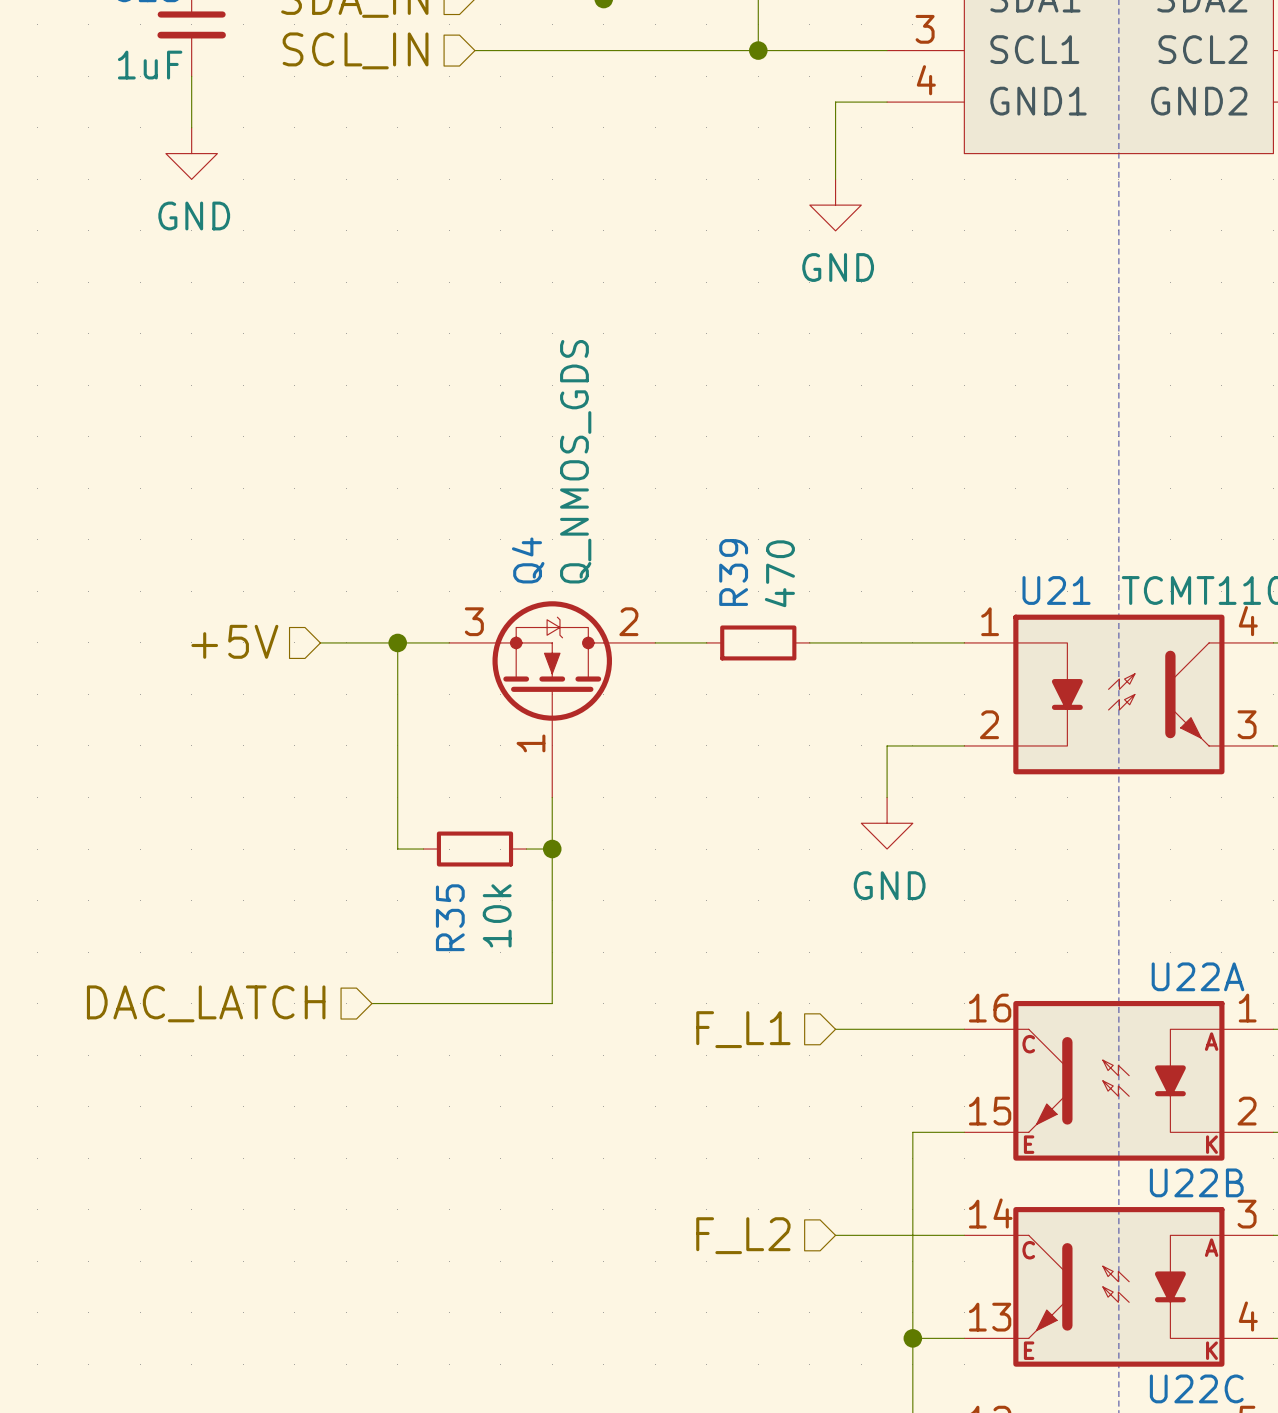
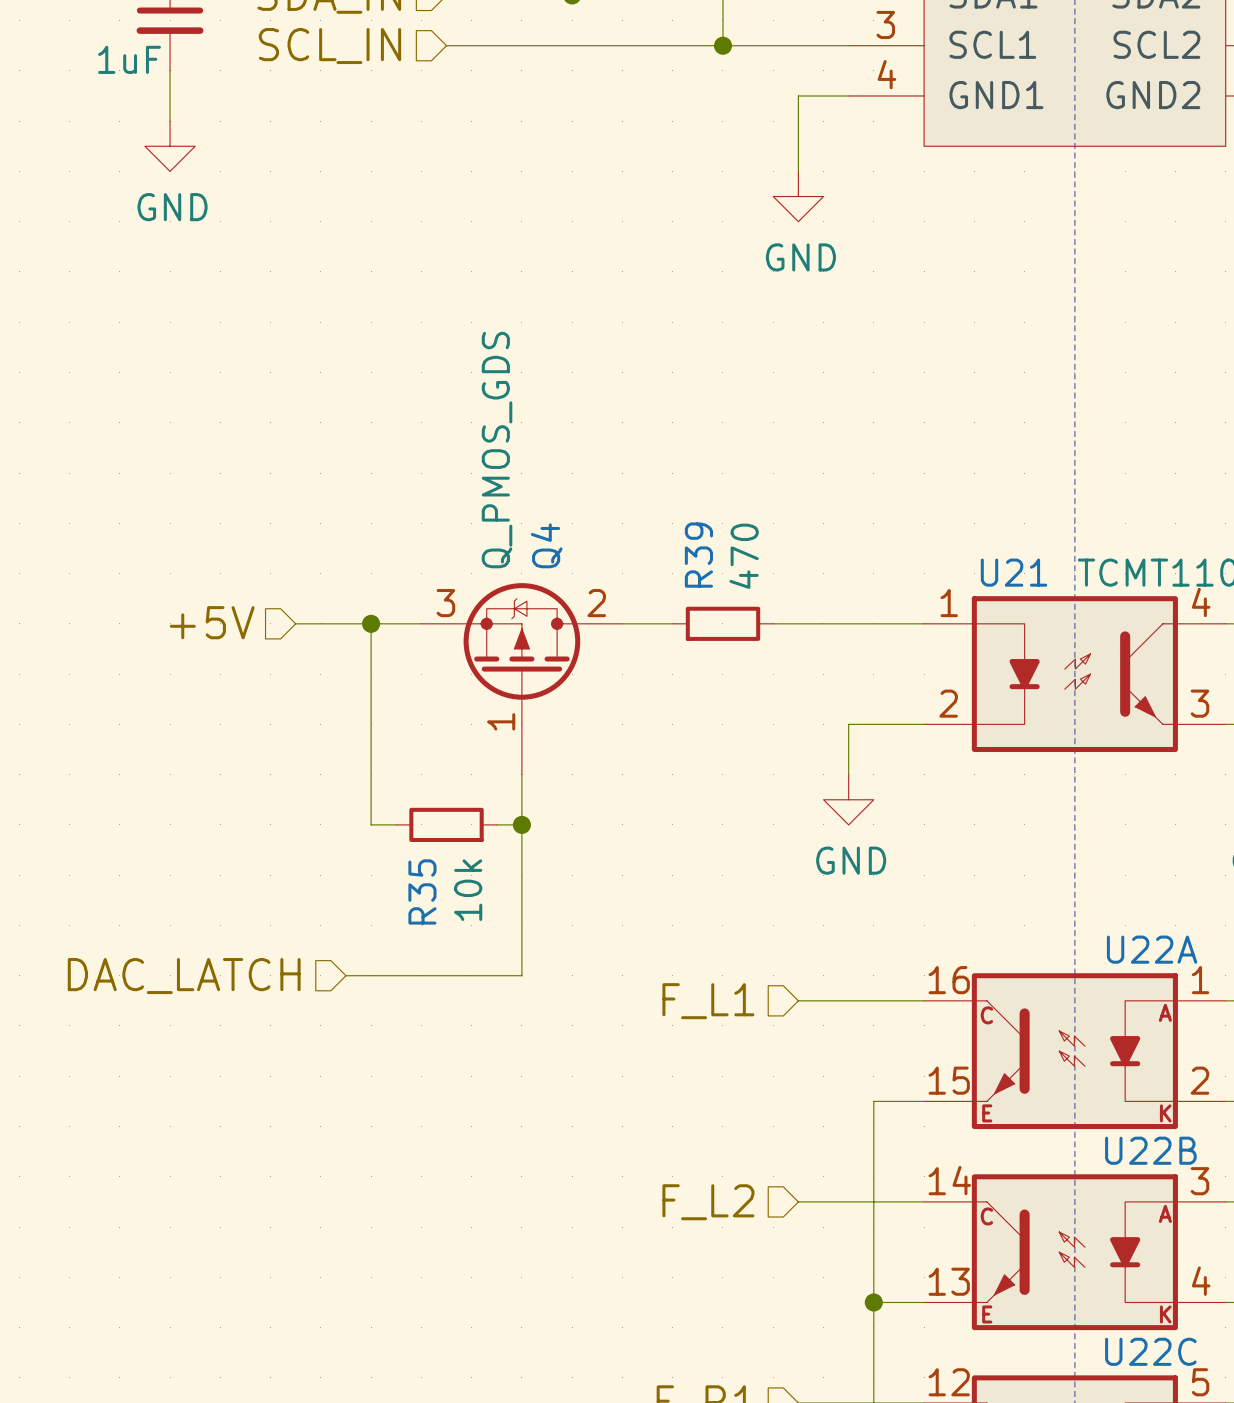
Q4 value: Q_NMOS_GDS (575, 461) -> Q_PMOS_GDS (497, 450)
Q4 name position: Q4 (528, 560) -> Q4 (546, 545)
Q4 symbol: [449, 601, 656, 798] -> [421, 583, 623, 775]

